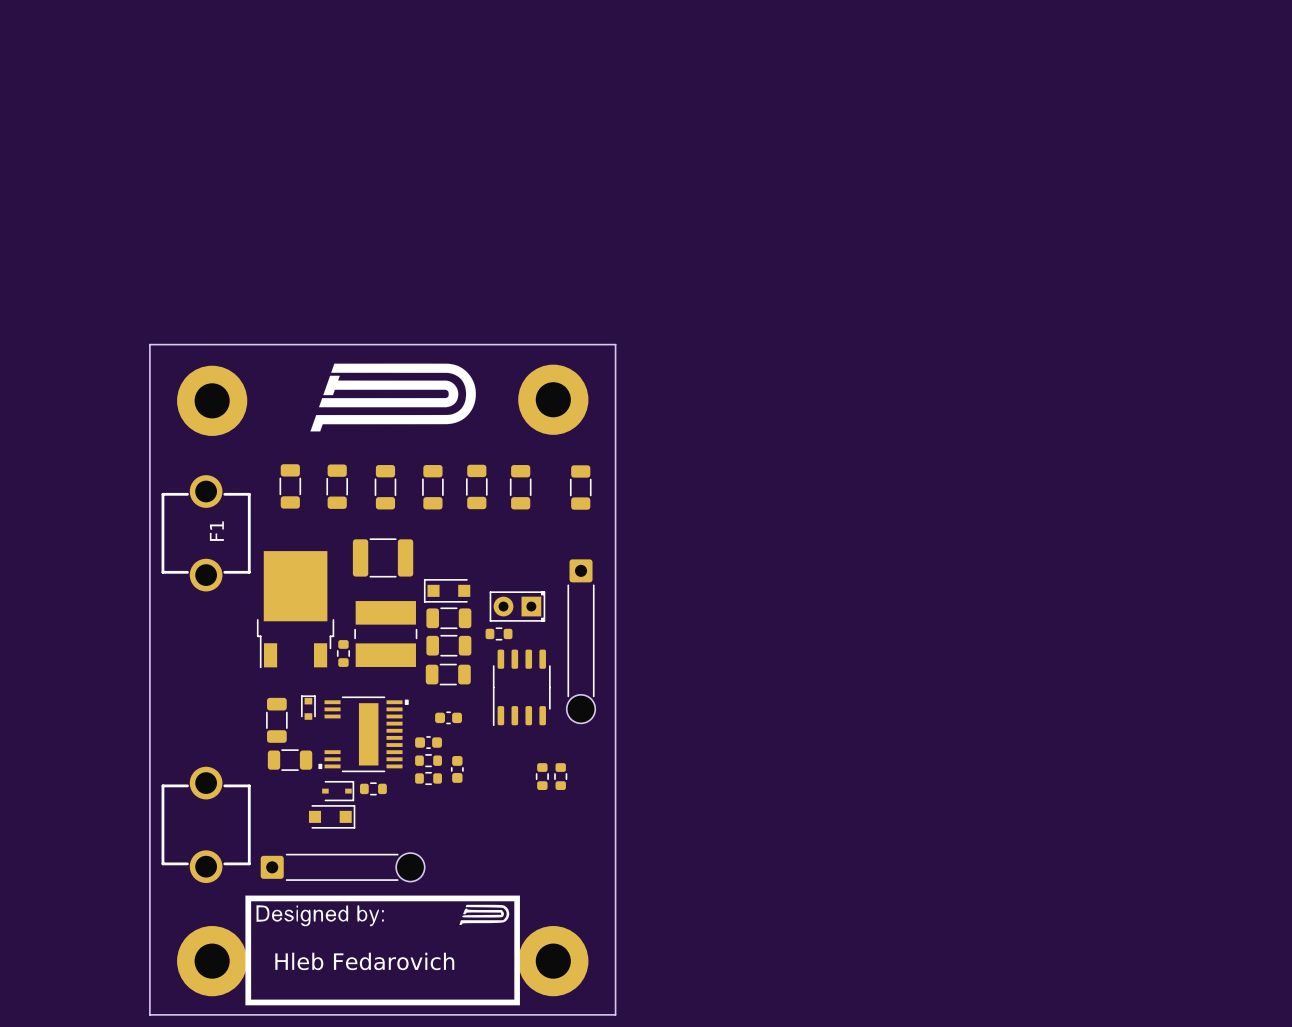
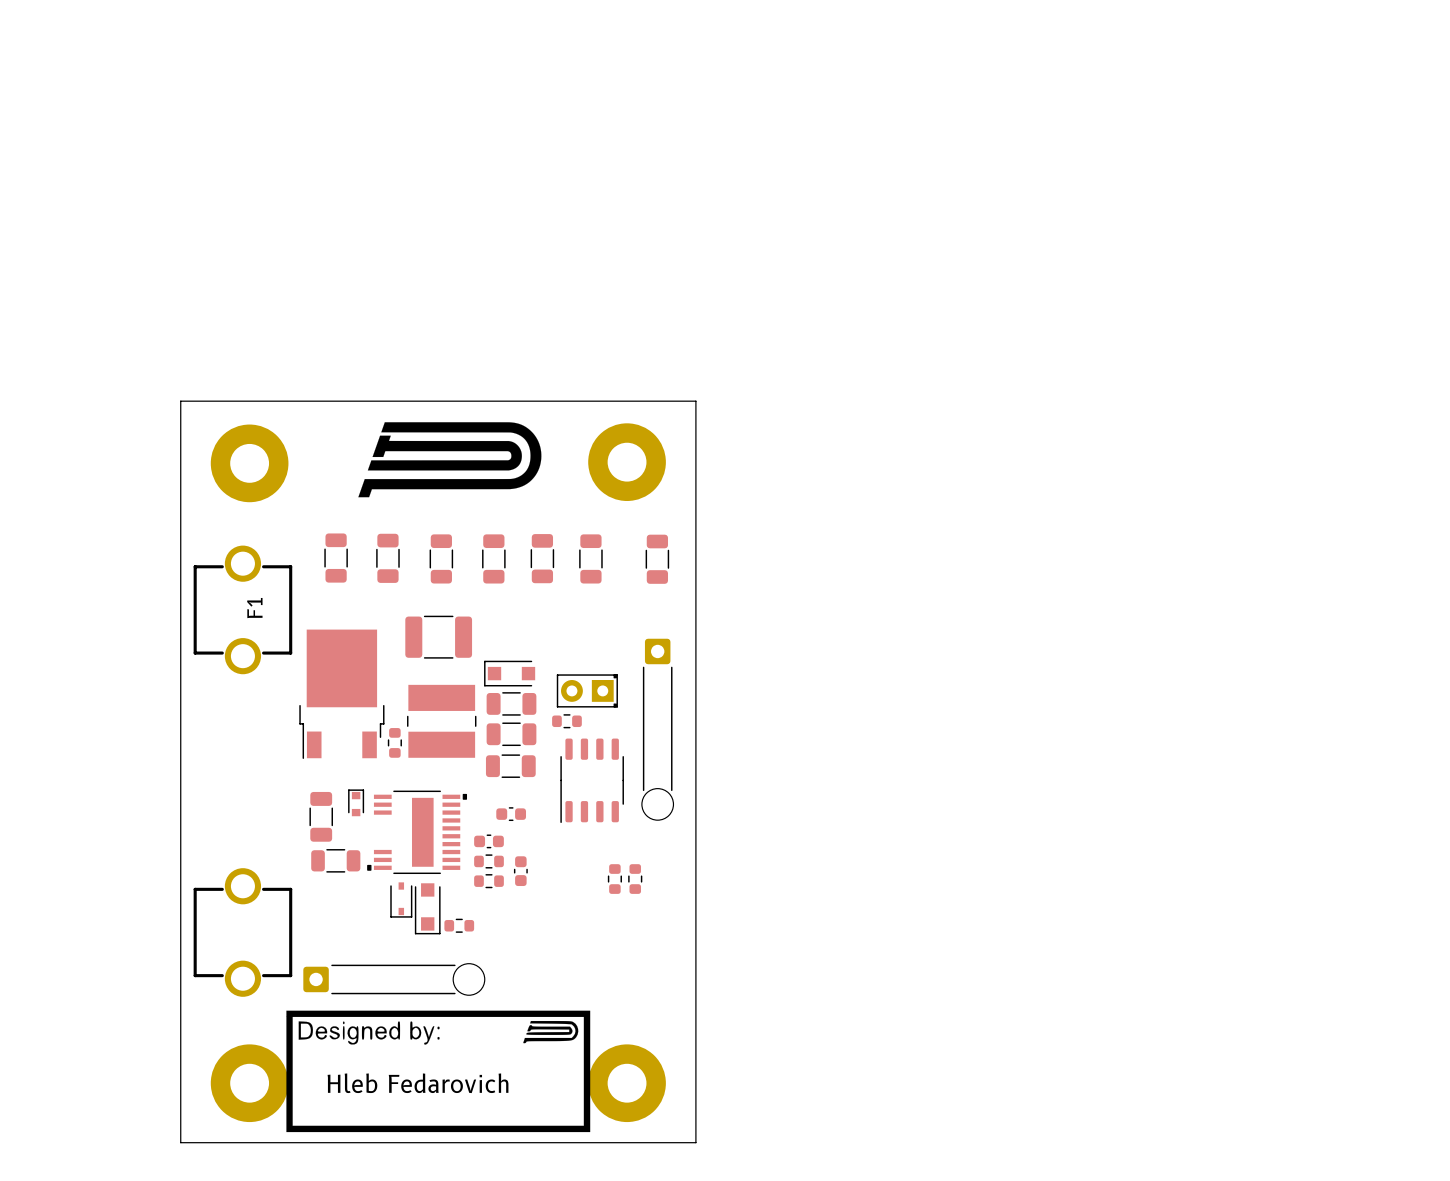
part position: (373, 788) -> (459, 925)
part rotation: 0° (338, 791) -> 90° clockwise (401, 900)
part rotation: 0° (332, 816) -> 90° clockwise (427, 908)
part position: (332, 816) -> (427, 908)

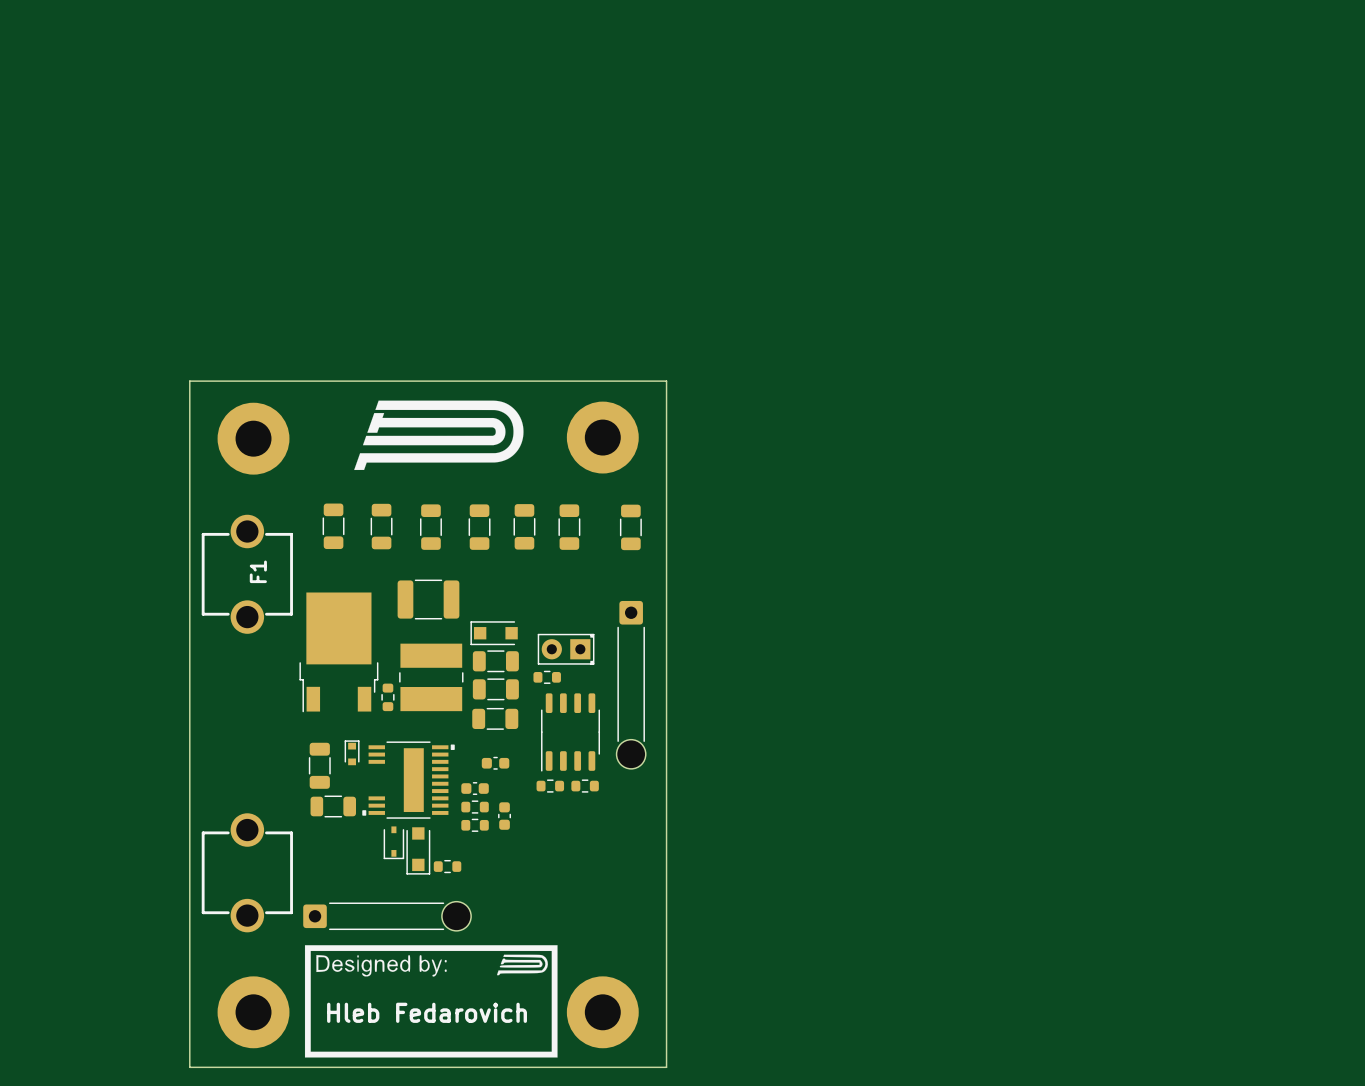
part: none -> (550, 786)
part: none -> (585, 786)
part: (614, 879) -> none
part: (635, 879) -> none
drawing shape: [286, 1010, 591, 1133] -> [304, 945, 558, 1058]

